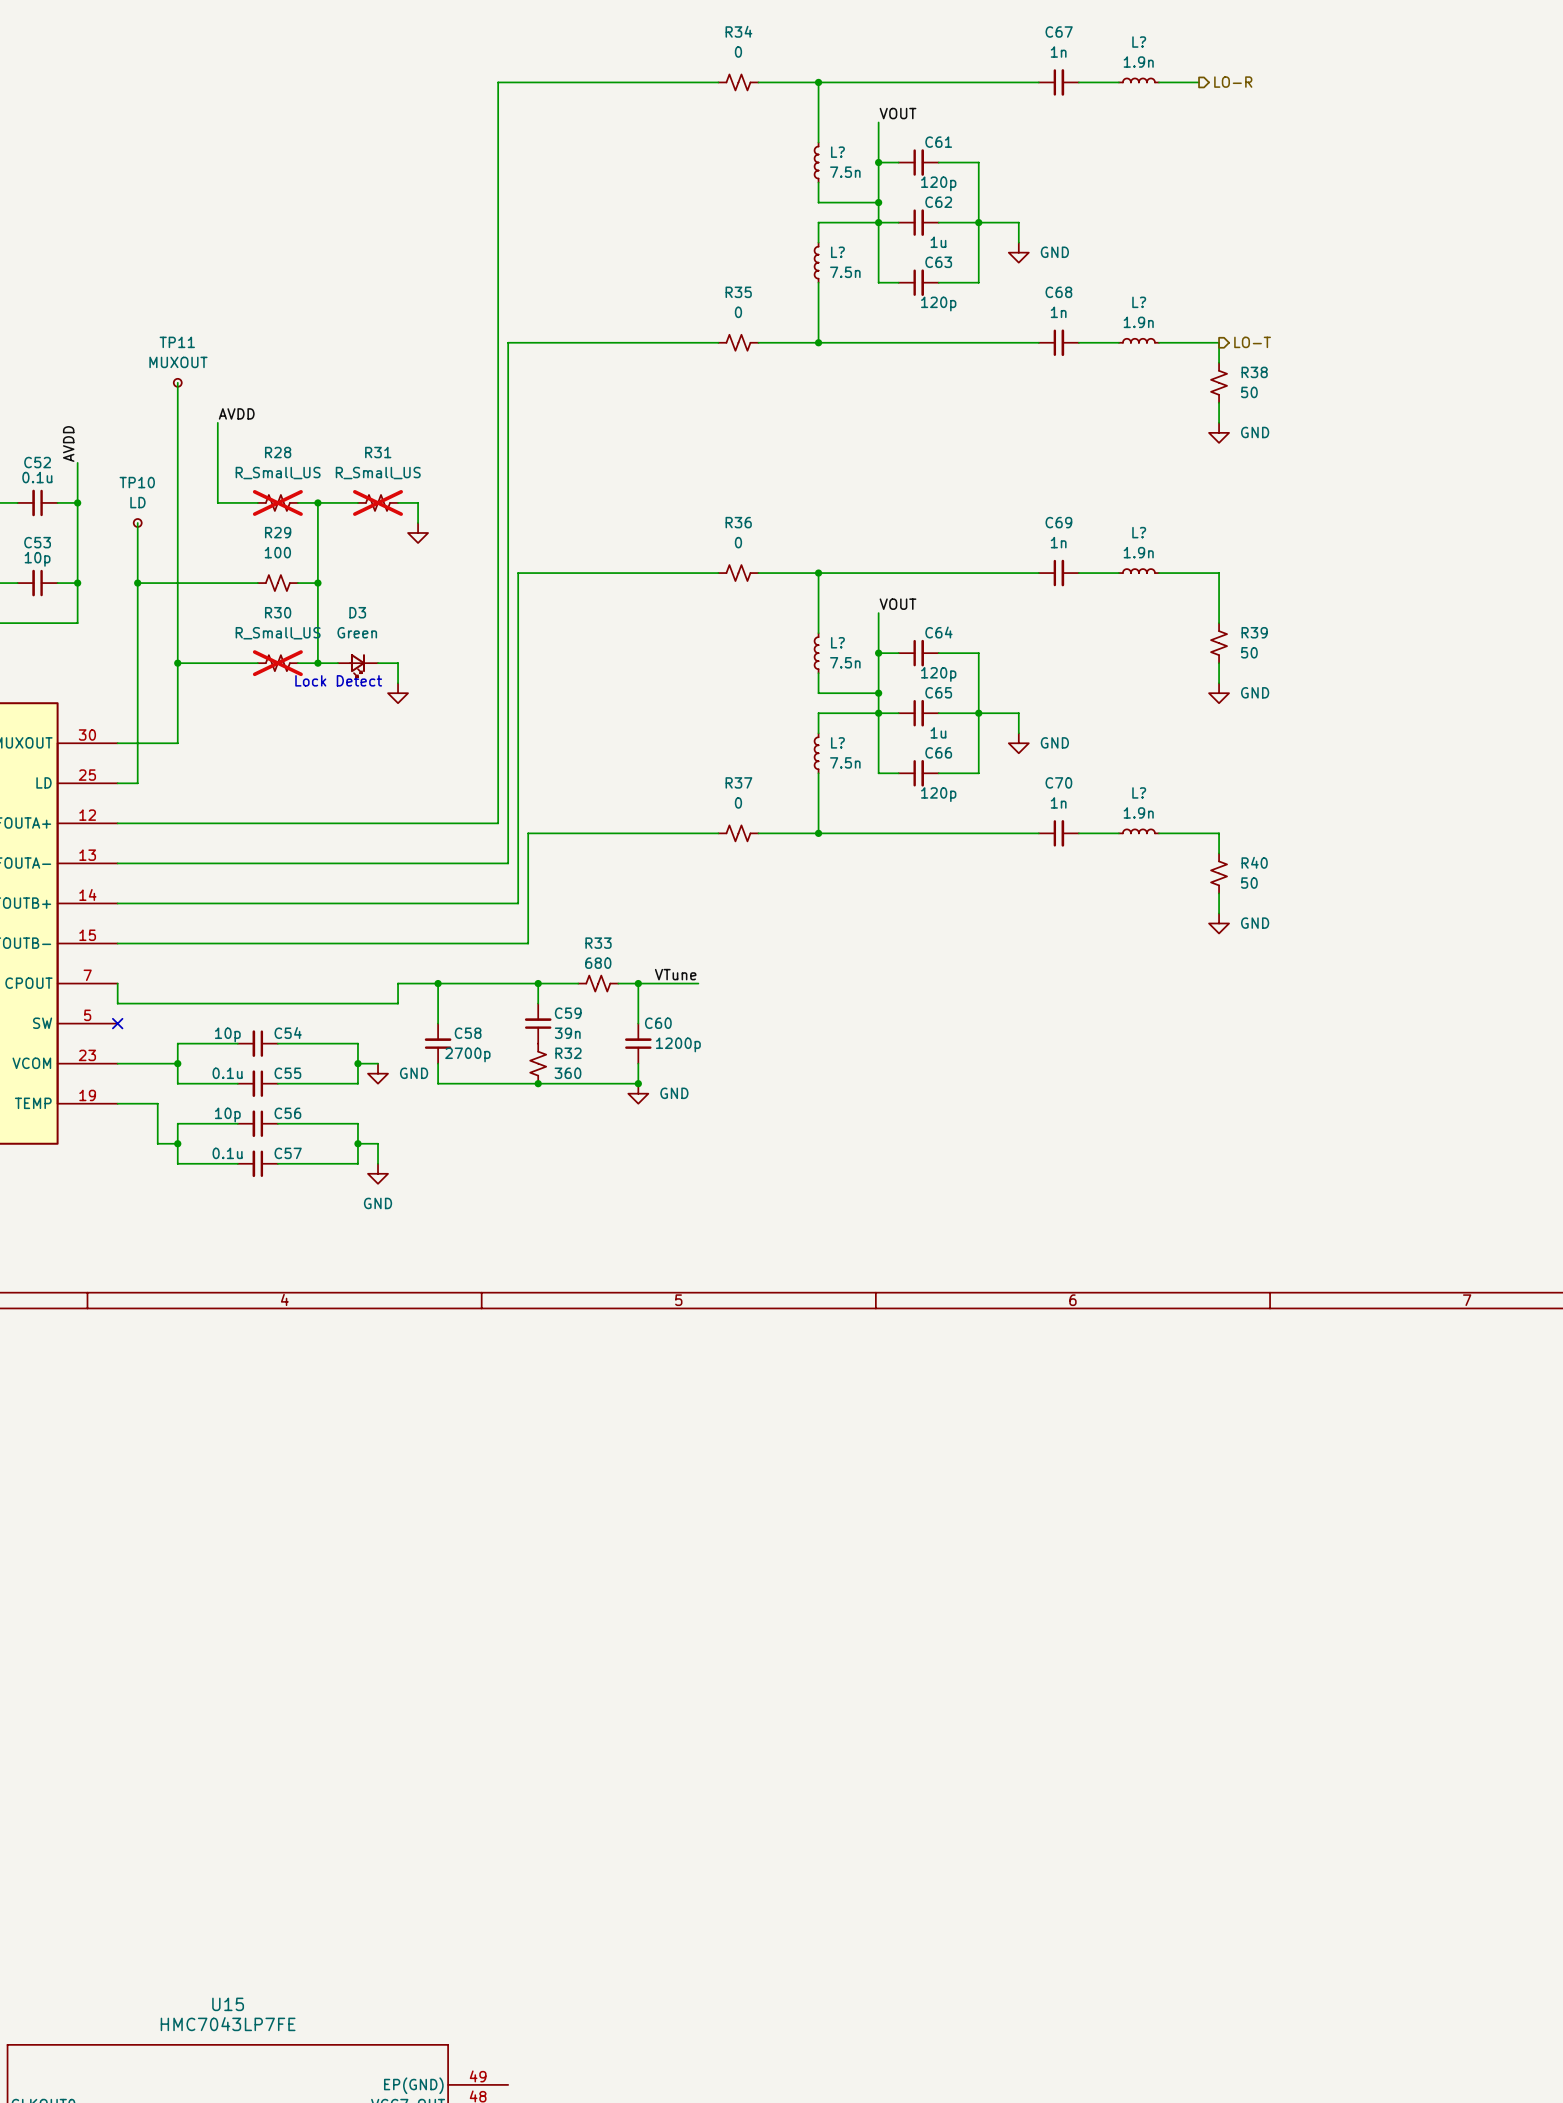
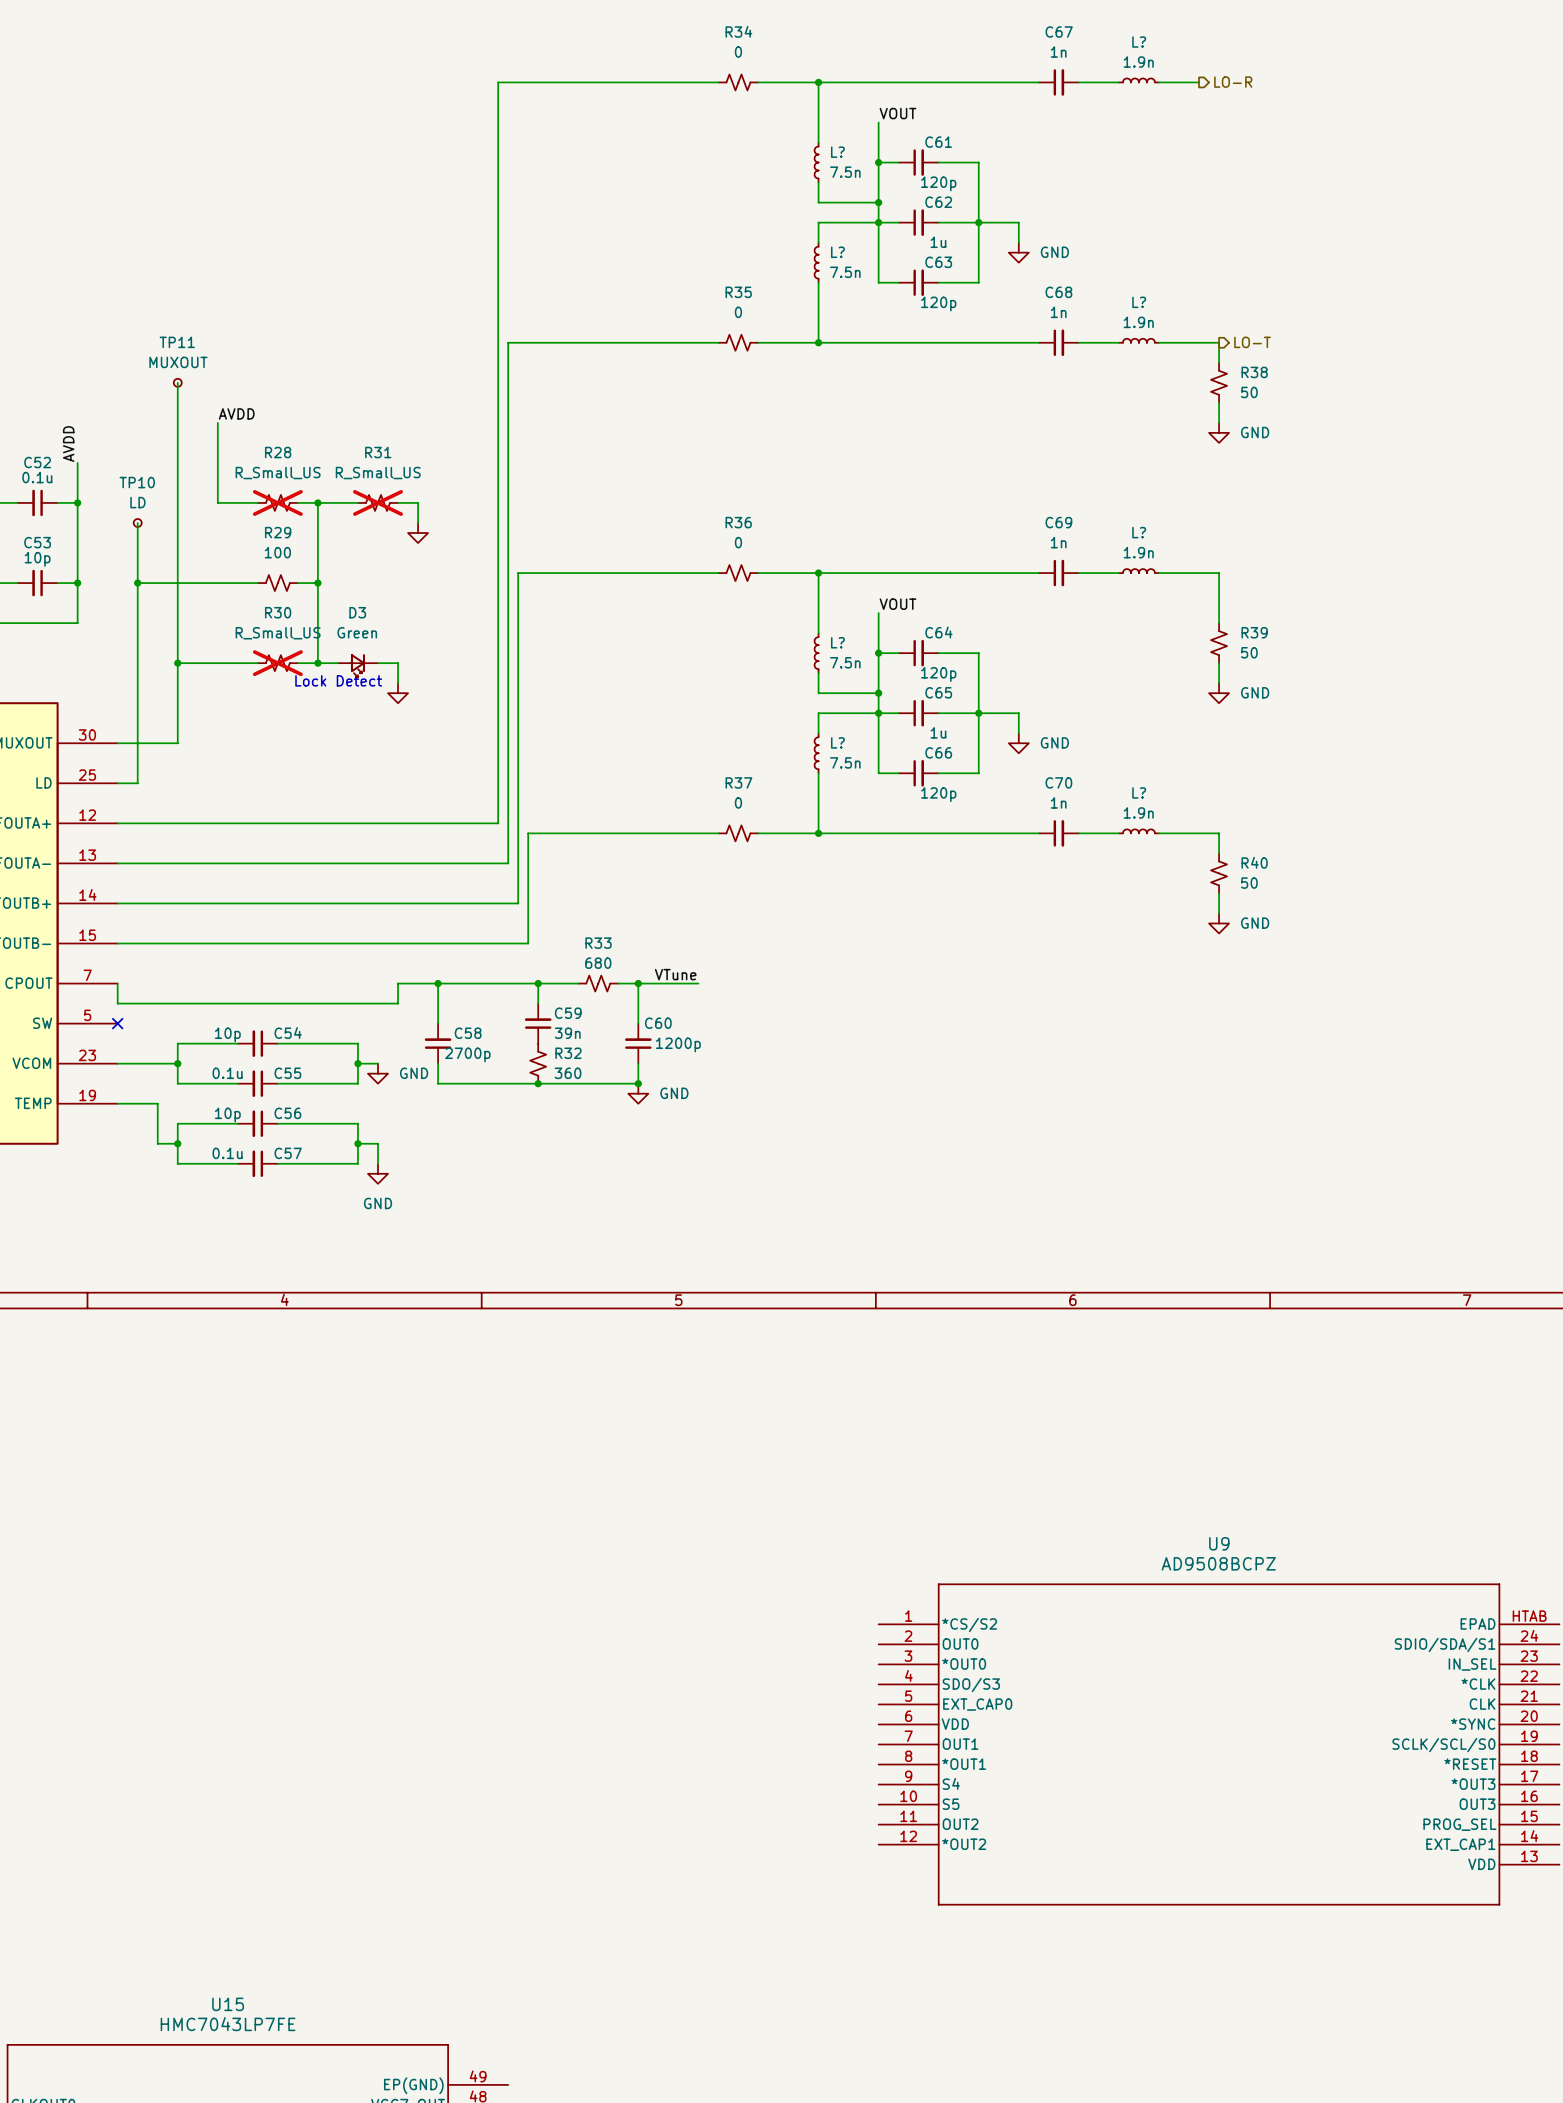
U9: none -> AD9508BCPZ (1219, 1744)

